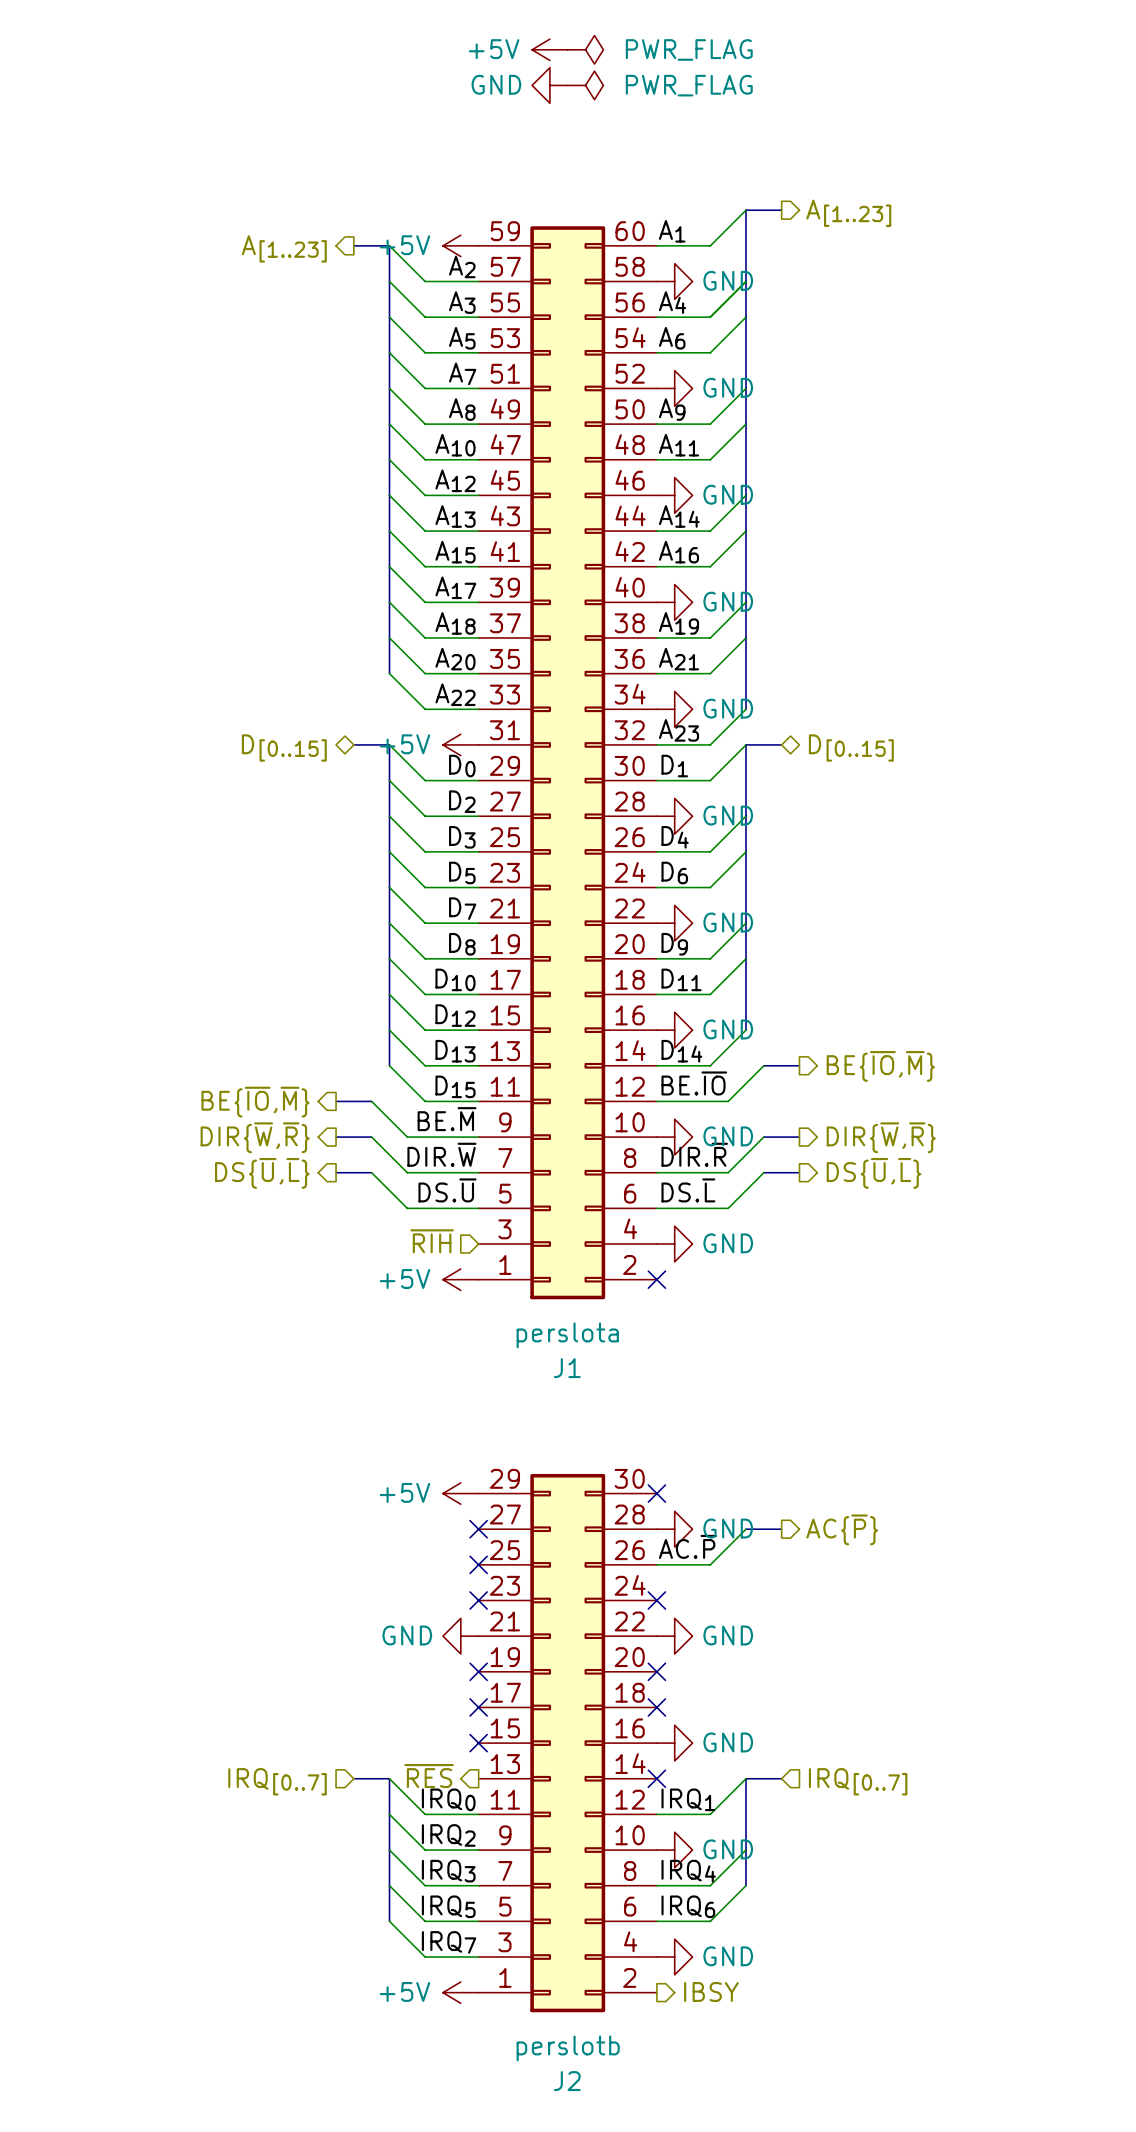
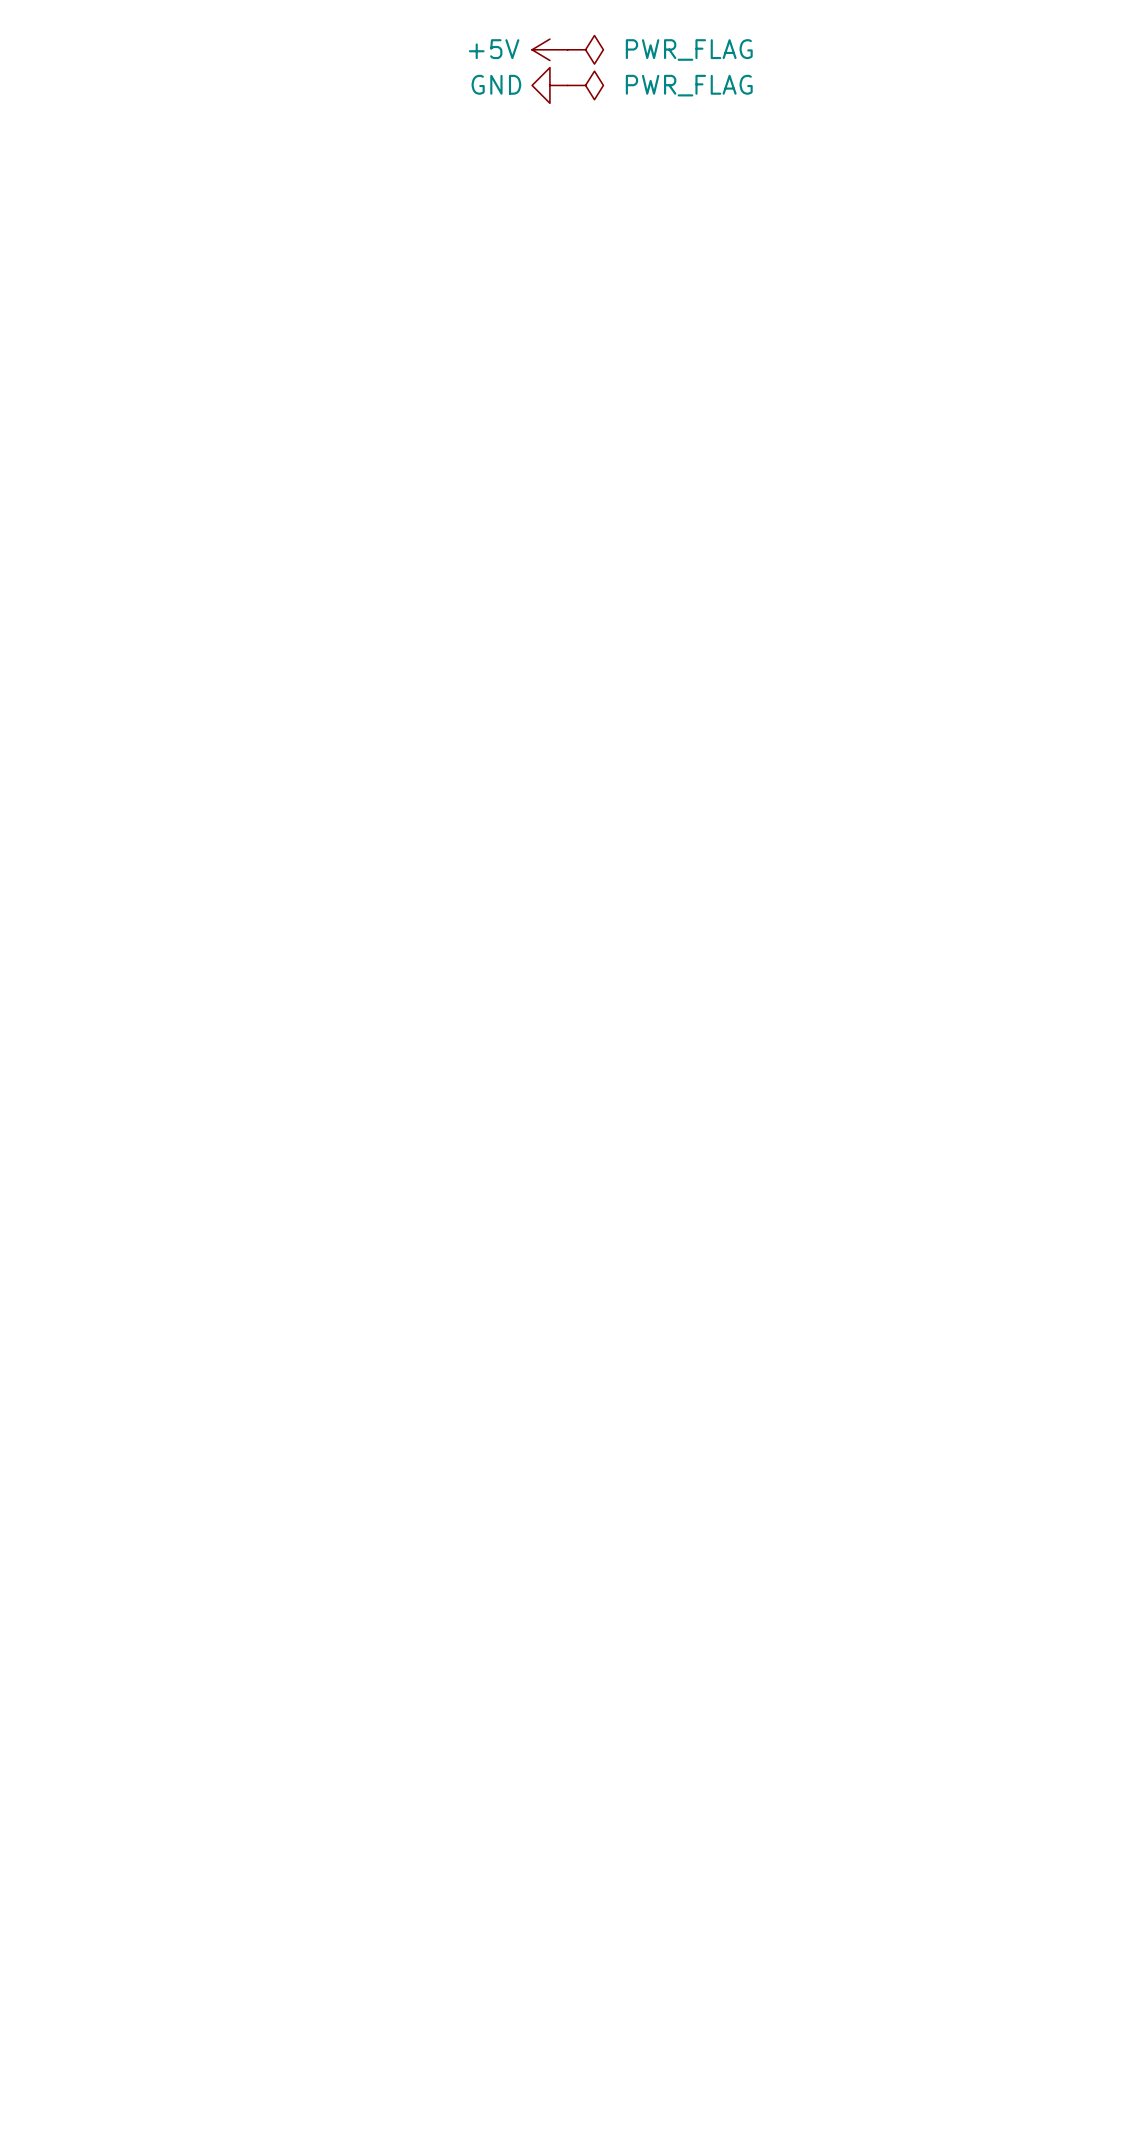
wire: (746, 210) (710, 245) (656, 245) -> none
bus: (781, 210) (746, 210) (746, 709) -> none
hierarchical label: A[1..23] (848, 213) -> none
label: A1 (672, 231) -> none
bus: (353, 245) (389, 245) (389, 673) -> none
wire: (389, 245) (425, 281) (478, 281) -> none
power symbol: +5V (460, 245) -> none
hierarchical label: A[1..23] (284, 248) -> none
label: A2 (462, 266) -> none
wire: (389, 281) (425, 317) (478, 317) -> none
power symbol: GND (674, 281) -> none
wire: (746, 281) (710, 317) (656, 317) -> none
label: A3 (462, 302) -> none
label: A4 (672, 302) -> none
wire: (389, 317) (425, 352) (478, 352) -> none
wire: (746, 317) (710, 352) (656, 352) -> none
label: A5 (462, 338) -> none
label: A6 (672, 338) -> none
wire: (389, 352) (425, 388) (478, 388) -> none
label: A7 (462, 373) -> none
wire: (389, 388) (425, 424) (478, 424) -> none
power symbol: GND (674, 388) -> none
wire: (746, 388) (710, 424) (656, 424) -> none
label: A8 (462, 409) -> none
label: A9 (672, 409) -> none
wire: (389, 424) (425, 459) (478, 459) -> none
wire: (746, 424) (710, 459) (656, 459) -> none
label: A10 (455, 445) -> none
label: A11 (678, 445) -> none
wire: (389, 459) (425, 495) (478, 495) -> none
label: A12 (455, 480) -> none
wire: (389, 495) (425, 531) (478, 531) -> none
power symbol: GND (674, 495) -> none
wire: (746, 495) (710, 531) (656, 531) -> none
label: A13 (455, 516) -> none
label: A14 (679, 516) -> none
wire: (389, 531) (425, 566) (478, 566) -> none
wire: (746, 531) (710, 566) (656, 566) -> none
label: A15 (455, 552) -> none
label: A16 (678, 552) -> none
wire: (389, 566) (425, 602) (478, 602) -> none
label: A17 (455, 587) -> none
wire: (389, 602) (425, 638) (478, 638) -> none
power symbol: GND (674, 602) -> none
wire: (746, 602) (710, 638) (656, 638) -> none
label: A18 (455, 623) -> none
label: A19 (678, 623) -> none
wire: (389, 638) (425, 673) (478, 673) -> none
wire: (746, 638) (710, 673) (656, 673) -> none
label: A20 (455, 659) -> none
label: A21 (678, 659) -> none
wire: (389, 673) (425, 709) (478, 709) -> none
label: A22 (455, 694) -> none
power symbol: GND (674, 709) -> none
wire: (746, 709) (710, 744) (656, 744) -> none
label: A23 (678, 730) -> none
bus: (353, 744) (389, 744) (389, 1065) -> none
wire: (389, 744) (425, 780) (478, 780) -> none
power symbol: +5V (460, 744) -> none
wire: (746, 744) (710, 780) (656, 780) -> none
bus: (781, 744) (746, 744) (746, 1030) -> none
hierarchical label: D[0..15] (284, 747) -> none
hierarchical label: D[0..15] (851, 747) -> none
J1: perslota (567, 762) -> none
label: D0 (462, 766) -> none
label: D1 (674, 766) -> none
wire: (389, 780) (425, 816) (478, 816) -> none
label: D2 (462, 801) -> none
wire: (389, 816) (425, 851) (478, 851) -> none
power symbol: GND (674, 816) -> none
wire: (746, 816) (710, 851) (656, 851) -> none
label: D3 (462, 837) -> none
label: D4 (675, 837) -> none
wire: (389, 851) (425, 887) (478, 887) -> none
wire: (746, 851) (710, 887) (656, 887) -> none
label: D5 (462, 872) -> none
label: D6 (674, 872) -> none
wire: (389, 887) (425, 923) (478, 923) -> none
label: D7 (462, 908) -> none
wire: (389, 923) (425, 958) (478, 958) -> none
power symbol: GND (674, 923) -> none
wire: (746, 923) (710, 958) (656, 958) -> none
label: D8 (462, 944) -> none
label: D9 (674, 944) -> none
wire: (389, 958) (425, 994) (478, 994) -> none
wire: (746, 958) (710, 994) (656, 994) -> none
label: D10 (455, 979) -> none
label: D11 (681, 979) -> none
wire: (389, 994) (425, 1030) (478, 1030) -> none
label: D12 (455, 1015) -> none
wire: (389, 1030) (425, 1065) (478, 1065) -> none
power symbol: GND (674, 1030) -> none
wire: (746, 1030) (710, 1065) (656, 1065) -> none
label: D13 (455, 1051) -> none
label: D14 (681, 1051) -> none
wire: (389, 1065) (425, 1101) (478, 1101) -> none
wire: (763, 1065) (728, 1101) (656, 1101) -> none
bus: (763, 1065) (799, 1065) -> none
hierarchical label: BE{~{IO},~{M}} (880, 1066) -> none
label: BE.~{IO} (694, 1083) -> none
label: D15 (455, 1086) -> none
bus: (336, 1101) (371, 1101) -> none
wire: (371, 1101) (407, 1137) (478, 1137) -> none
hierarchical label: BE{~{IO},~{M}} (255, 1102) -> none
label: BE.~{M} (447, 1119) -> none
hierarchical label: DIR{~{W},~{R}} (255, 1137) -> none
bus: (336, 1137) (371, 1137) -> none
wire: (371, 1137) (407, 1172) (478, 1172) -> none
power symbol: GND (674, 1137) -> none
wire: (763, 1137) (728, 1172) (656, 1172) -> none
bus: (763, 1137) (799, 1137) -> none
hierarchical label: DIR{~{W},~{R}} (881, 1137) -> none
label: DIR.~{W} (441, 1154) -> none
label: DIR.~{R} (694, 1154) -> none
bus: (336, 1172) (371, 1172) -> none
wire: (371, 1172) (407, 1208) (478, 1208) -> none
wire: (763, 1172) (728, 1208) (656, 1208) -> none
bus: (763, 1172) (799, 1172) -> none
hierarchical label: DS{~{U},~{L}} (262, 1173) -> none
hierarchical label: DS{~{U},~{L}} (874, 1173) -> none
label: DS.~{U} (447, 1190) -> none
label: DS.~{L} (688, 1190) -> none
hierarchical label: ~{RIH} (432, 1241) -> none
power symbol: GND (674, 1244) -> none
power symbol: +5V (460, 1279) -> none
no-connect mark: (656, 1279) -> none
power symbol: +5V (460, 1493) -> none
no-connect mark: (656, 1493) -> none
no-connect mark: (478, 1529) -> none
power symbol: GND (674, 1529) -> none
wire: (746, 1529) (710, 1564) (656, 1564) -> none
bus: (746, 1529) (781, 1529) -> none
hierarchical label: AC{~{P}} (842, 1529) -> none
label: AC.~{P} (687, 1546) -> none
no-connect mark: (478, 1564) -> none
no-connect mark: (478, 1600) -> none
no-connect mark: (656, 1600) -> none
power symbol: GND (460, 1636) -> none
power symbol: GND (674, 1636) -> none
no-connect mark: (478, 1671) -> none
no-connect mark: (656, 1671) -> none
no-connect mark: (478, 1707) -> none
no-connect mark: (656, 1707) -> none
no-connect mark: (478, 1743) -> none
J2: perslotb (567, 1743) -> none
power symbol: GND (674, 1743) -> none
hierarchical label: ~{RES} (429, 1776) -> none
bus: (353, 1778) (389, 1778) (389, 1921) -> none
wire: (389, 1778) (425, 1814) (478, 1814) -> none
no-connect mark: (656, 1778) -> none
wire: (746, 1778) (710, 1814) (656, 1814) -> none
bus: (781, 1778) (746, 1778) (746, 1885) -> none
hierarchical label: IRQ[0..7] (277, 1781) -> none
hierarchical label: IRQ[0..7] (858, 1781) -> none
label: IRQ0 (448, 1799) -> none
label: IRQ1 (688, 1799) -> none
wire: (389, 1814) (425, 1850) (478, 1850) -> none
label: IRQ2 (448, 1835) -> none
wire: (389, 1850) (425, 1885) (478, 1885) -> none
power symbol: GND (674, 1850) -> none
wire: (746, 1850) (710, 1885) (656, 1885) -> none
label: IRQ3 (448, 1871) -> none
label: IRQ4 (688, 1871) -> none
wire: (389, 1885) (425, 1921) (478, 1921) -> none
wire: (746, 1885) (710, 1921) (656, 1921) -> none
label: IRQ5 (448, 1906) -> none
label: IRQ6 (688, 1906) -> none
wire: (389, 1921) (425, 1956) (478, 1956) -> none
label: IRQ7 (449, 1942) -> none
power symbol: GND (674, 1956) -> none
hierarchical label: IBSY (711, 1991) -> none
power symbol: +5V (460, 1992) -> none

